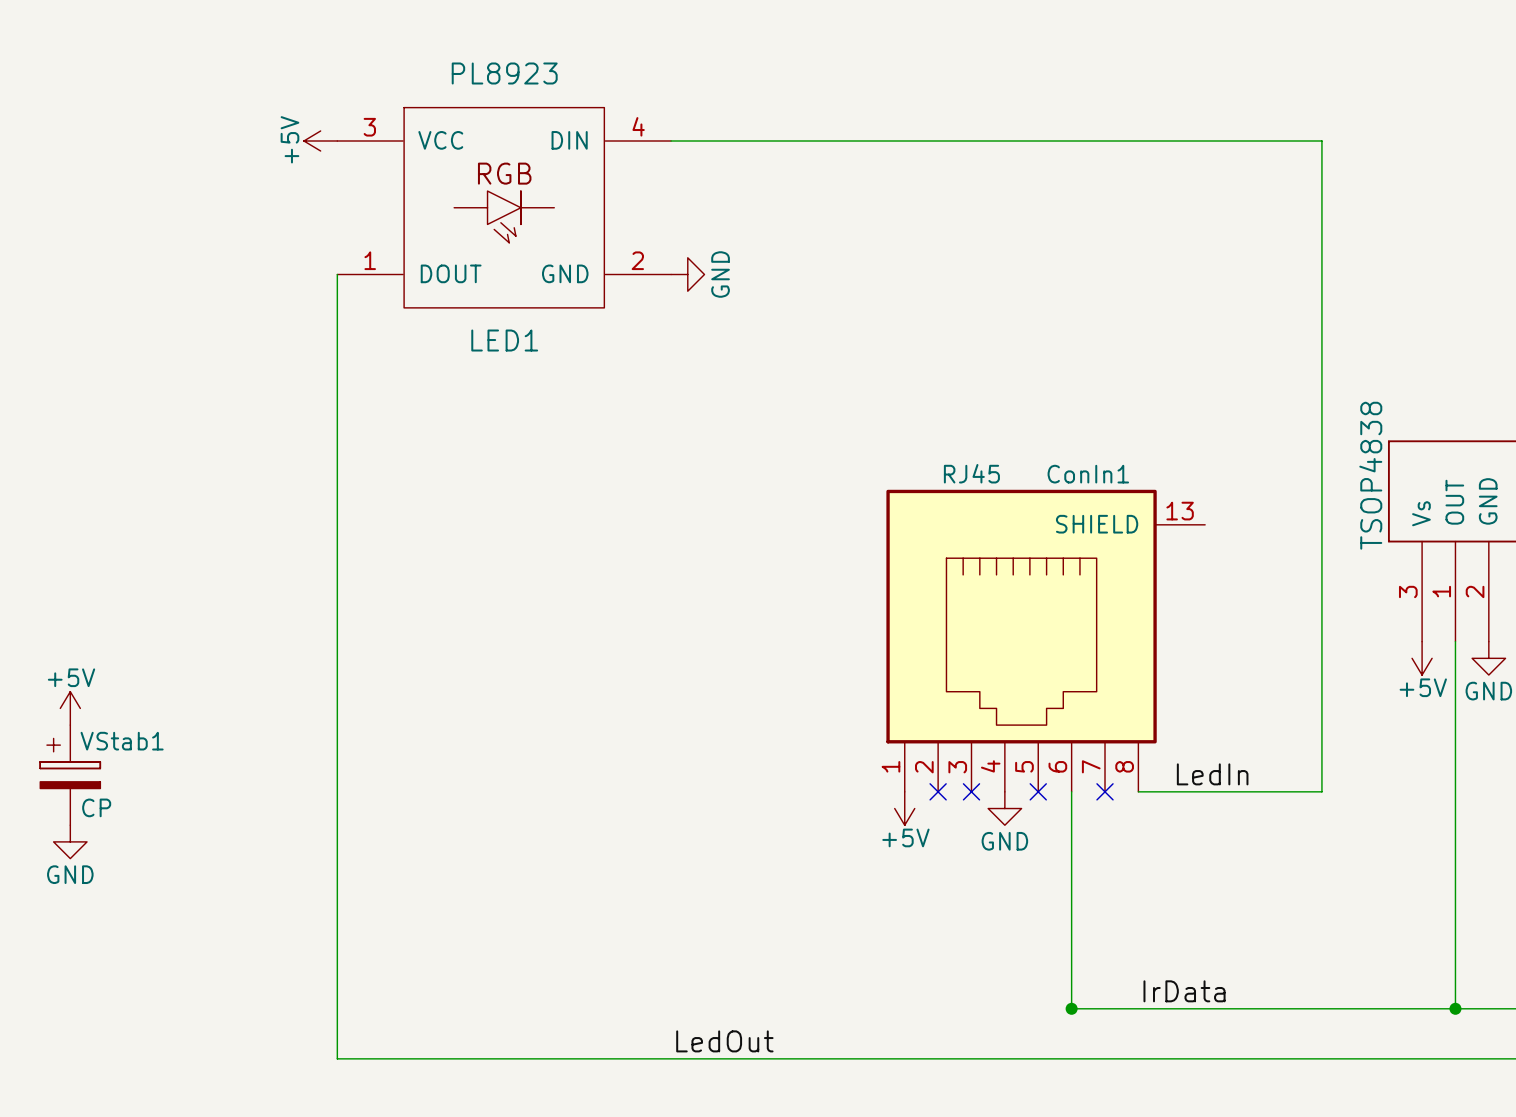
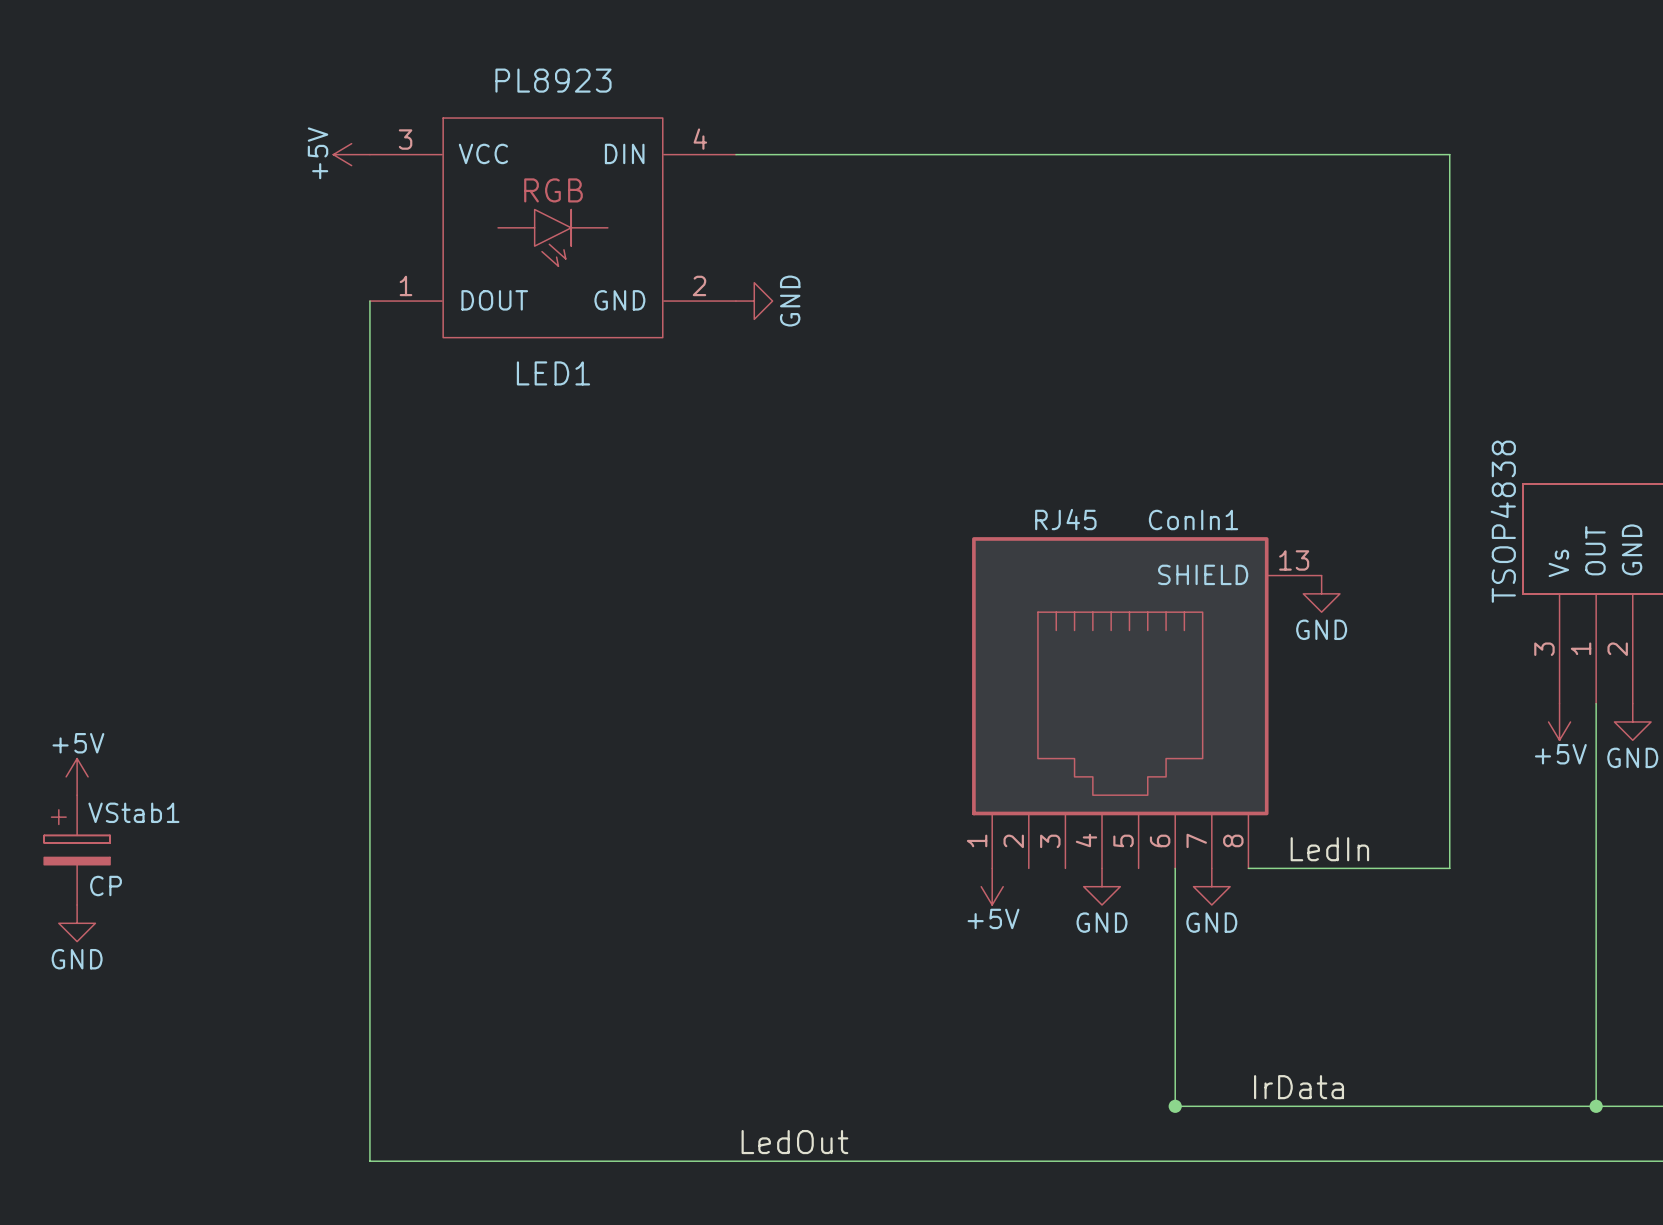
power symbol: none -> GND (1321, 593)
no-connect mark: (938, 791) -> none
no-connect mark: (971, 791) -> none
no-connect mark: (1038, 791) -> none
no-connect mark: (1105, 791) -> none
power symbol: none -> GND (1211, 886)

